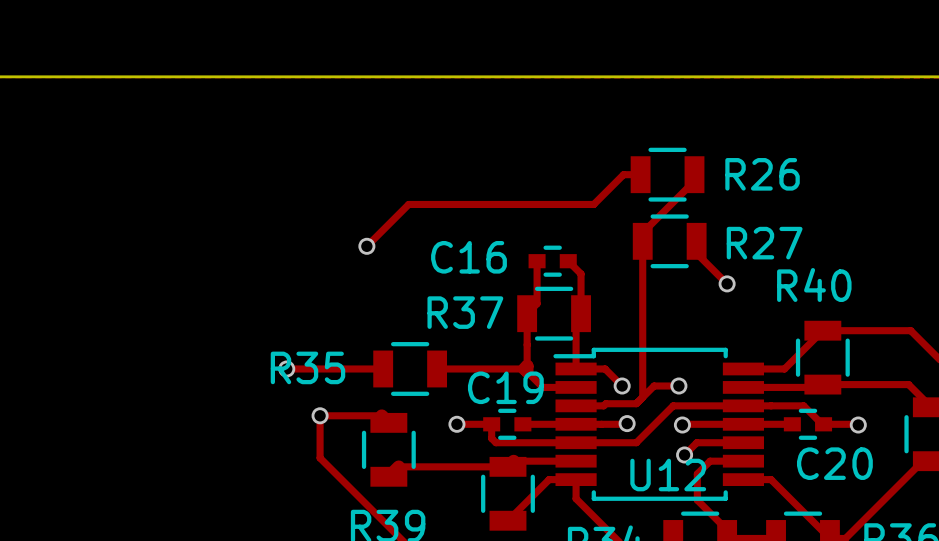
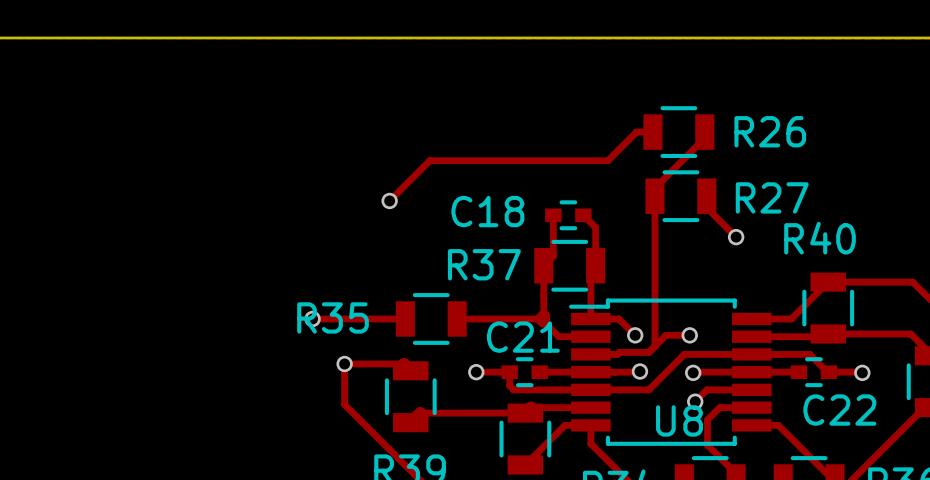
C16 name: C16 (468, 257) -> C18 (487, 211)
C19 name: C19 (505, 387) -> C21 (523, 337)
C20 name: C20 (834, 463) -> C22 (839, 410)
U12 name: U12 (668, 475) -> U8 (679, 420)

